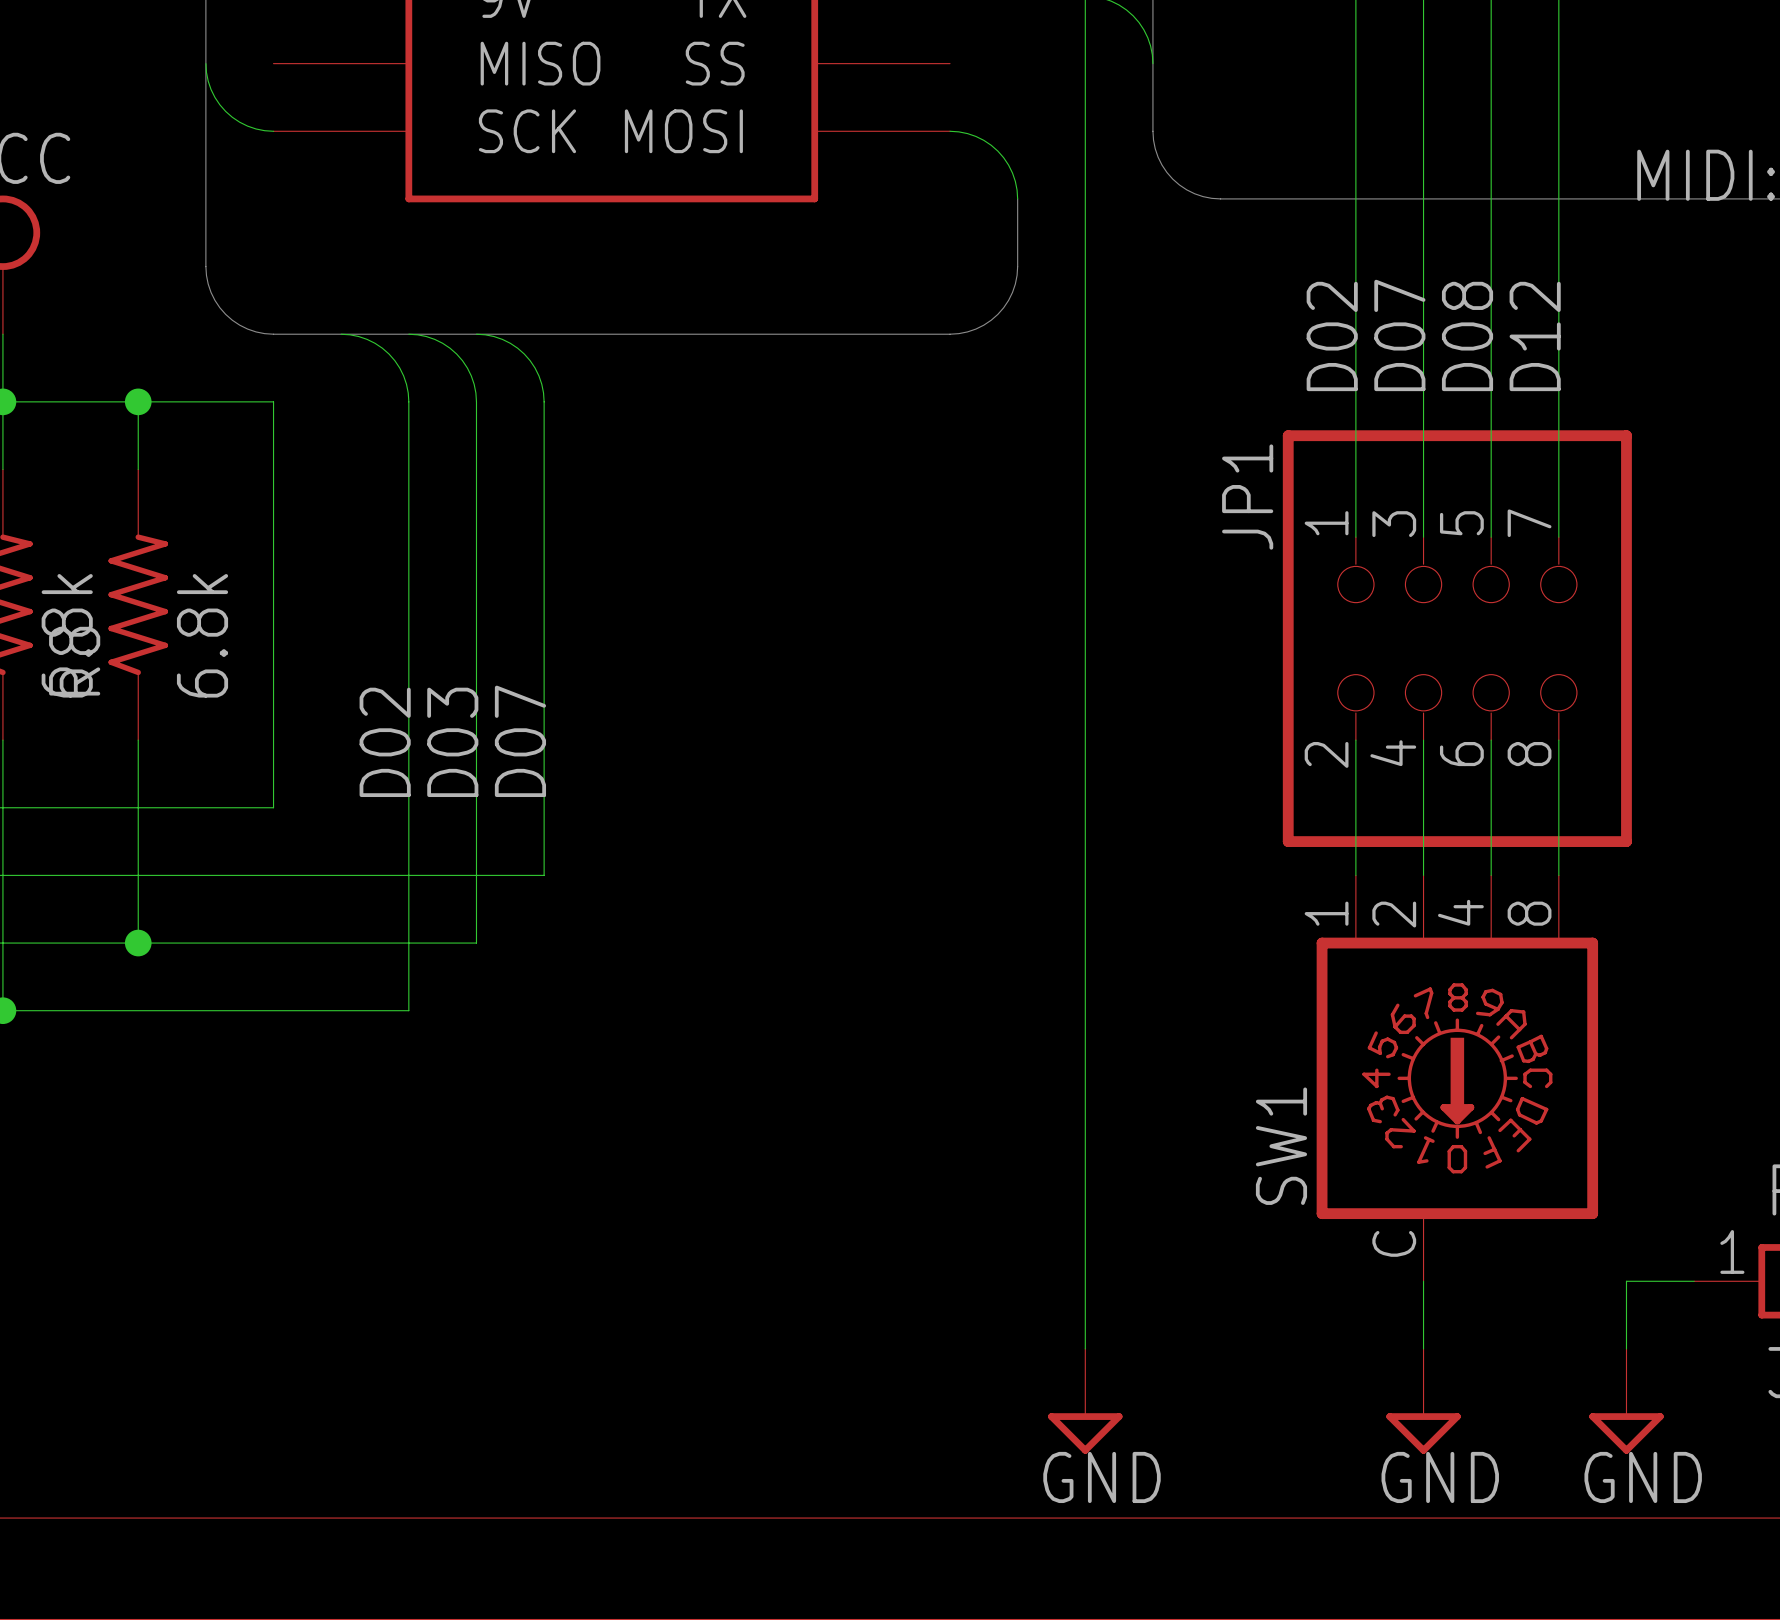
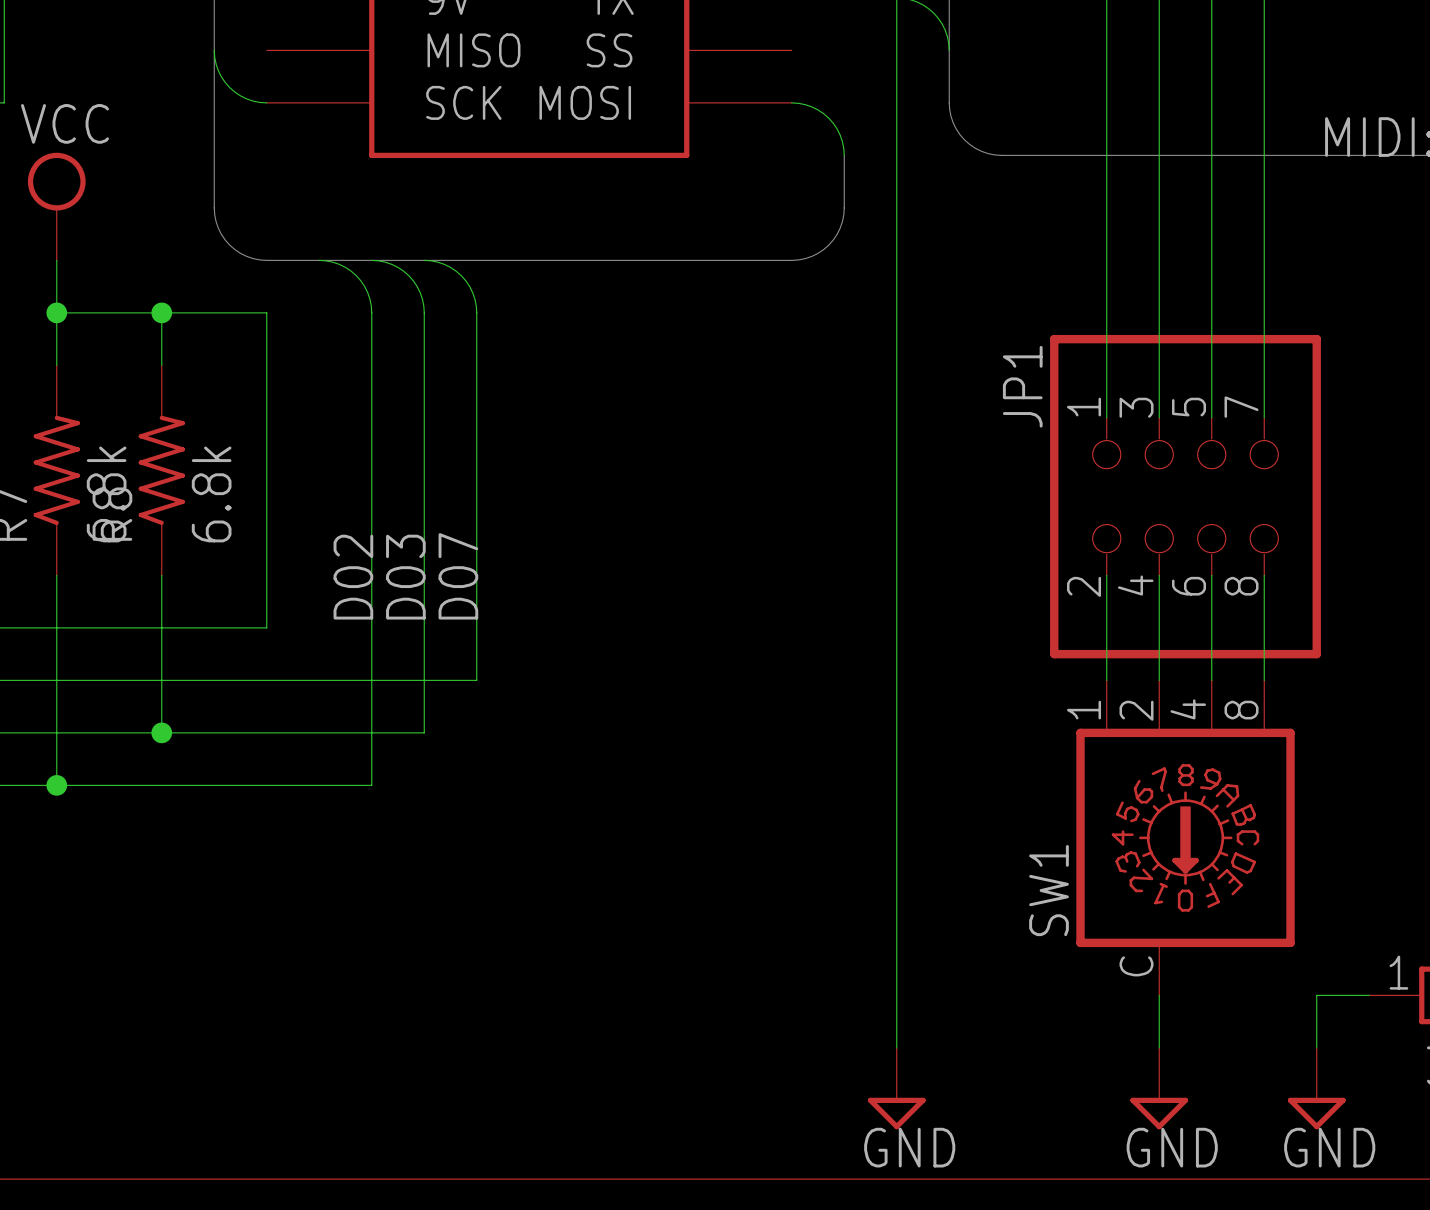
label: D07 (1399, 335) -> none
label: D02 (1332, 336) -> none
label: D08 (1467, 336) -> none
label: D12 (1535, 336) -> none

